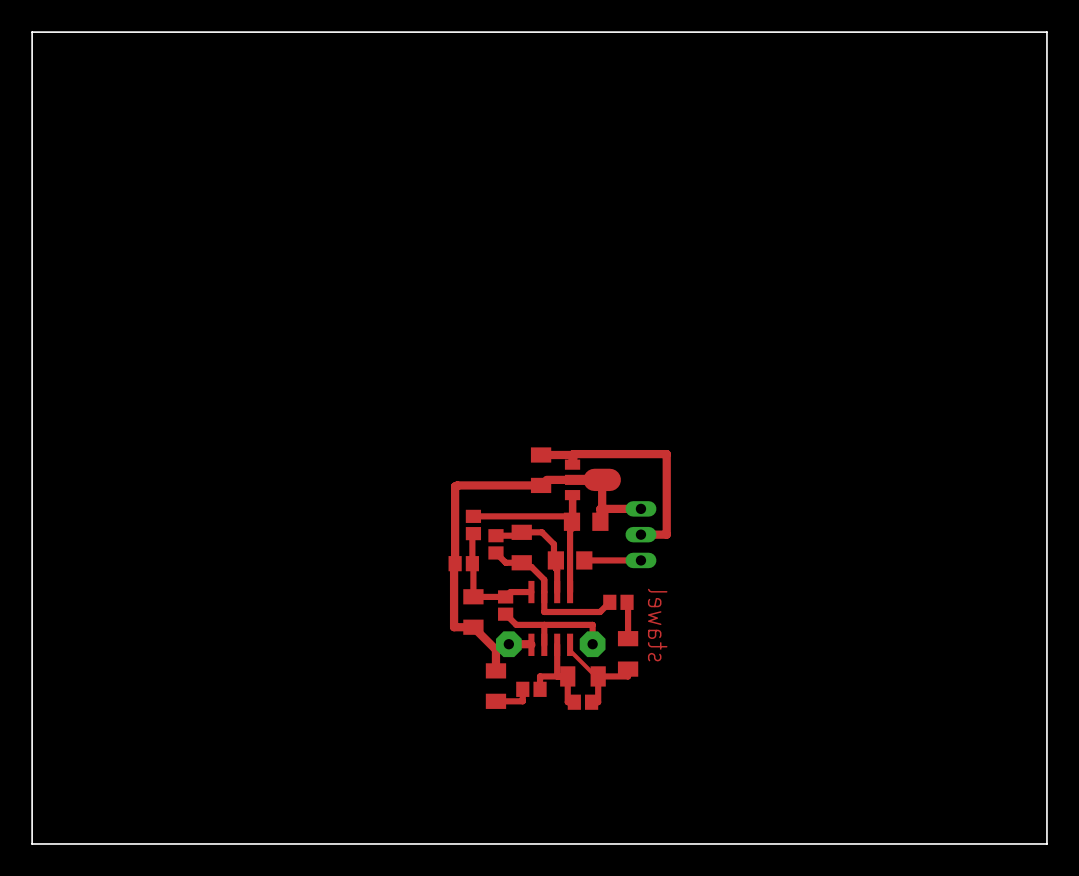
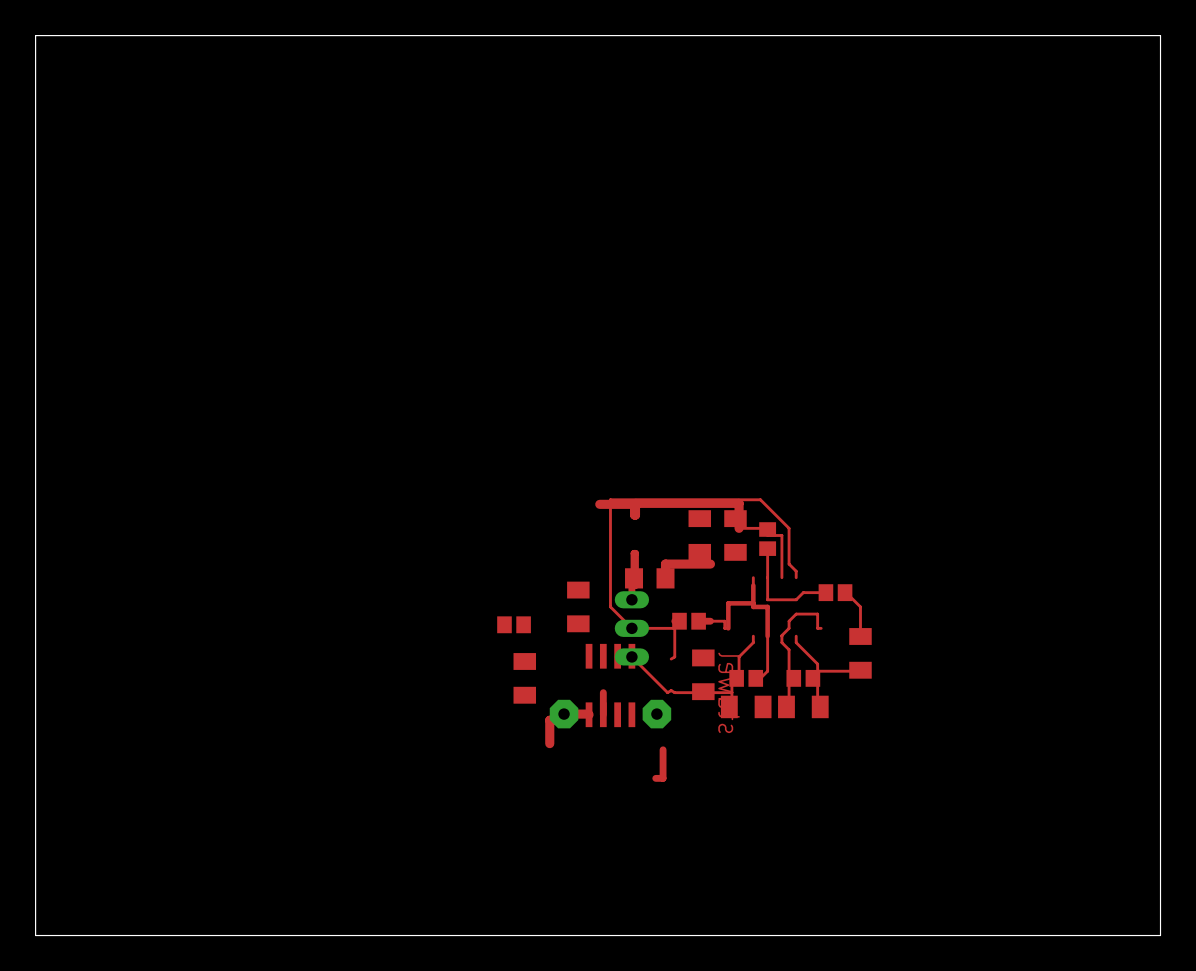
part: (541, 470) -> none
top track: (666, 476) (666, 534) (640, 534) -> (739, 528) (767, 528) (767, 535) (781, 535) (781, 577)
part: (592, 479) -> none
part: none -> (699, 535)
part: none -> (735, 535)
part: none -> (767, 539)
top track: none -> (767, 548) (767, 599) (796, 599) (803, 592) (825, 592)
top track: (572, 495) (571, 521) (566, 516) (473, 516) -> none
top track: (602, 508) (602, 479) (546, 479) (541, 485) (455, 486) (454, 627) (473, 627) (495, 649) -> none
top track: none -> (753, 577) (753, 606) (767, 606) (767, 671) (760, 678) (755, 678)
part: (473, 524) -> none
top track: (473, 533) (473, 596) (505, 596) (510, 592) (531, 592) -> none
part: (640, 534) -> none
part: none -> (835, 592)
top track: none -> (845, 592) (860, 606) (860, 636)
top track: (495, 535) (518, 535) (521, 532) (541, 532) (553, 544) (557, 592) -> none
top track: (570, 541) (570, 592) -> none
part: (495, 544) -> none
top track: none -> (753, 603) (728, 603) (728, 628) (724, 628) (724, 621) (710, 621)
part footprint: [547, 551, 593, 570] -> [614, 591, 650, 666]
top track: (495, 552) (505, 562) (521, 562) (525, 566) (531, 566) (544, 579) (544, 611) (600, 611) (609, 602) -> none
top track: (608, 560) (584, 560) -> (674, 621) (674, 656) (671, 659)
part: none -> (689, 621)
top track: (630, 560) (613, 560) -> (796, 577) (796, 571) (789, 564) (789, 528) (760, 499) (610, 499) (610, 606) (631, 628) (674, 628) (679, 621)
top track: none -> (821, 628) (817, 628) (817, 614) (796, 614) (789, 621) (789, 628) (781, 635) (781, 642) (789, 649) (789, 706) (786, 706)
top track: none -> (753, 636) (753, 642) (739, 656) (739, 678) (731, 678) (731, 706) (729, 706)
top track: none -> (796, 636) (796, 642) (817, 664) (817, 706) (820, 706)
part: none -> (860, 653)
top track: none -> (631, 656) (667, 692) (671, 690) (674, 692) (731, 692)
part: (618, 602) -> none
top track: (627, 602) (628, 638) -> none
top track: none -> (860, 670) (817, 671) (812, 678) (817, 678)
part: (505, 605) -> none
part: none -> (703, 674)
part: none -> (746, 678)
part: none -> (803, 678)
top track: (505, 614) (516, 624) (592, 624) (592, 644) -> none
part: none -> (746, 706)
part: none -> (803, 706)
top track: (557, 644) (557, 676) -> none
top track: (570, 644) (570, 650) (595, 676) (628, 676) (628, 669) -> none
part: (628, 653) -> none
part: (582, 676) -> none
part: (495, 686) -> none
top track: (522, 689) (522, 701) (495, 701) -> none
part: (531, 689) -> none
top track: (540, 689) (540, 676) (567, 676) (567, 702) (574, 702) -> none
part: (582, 702) -> none

